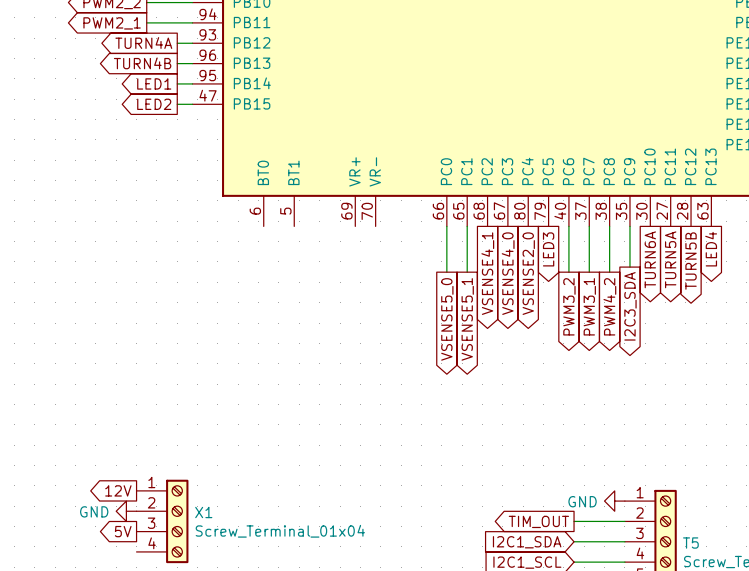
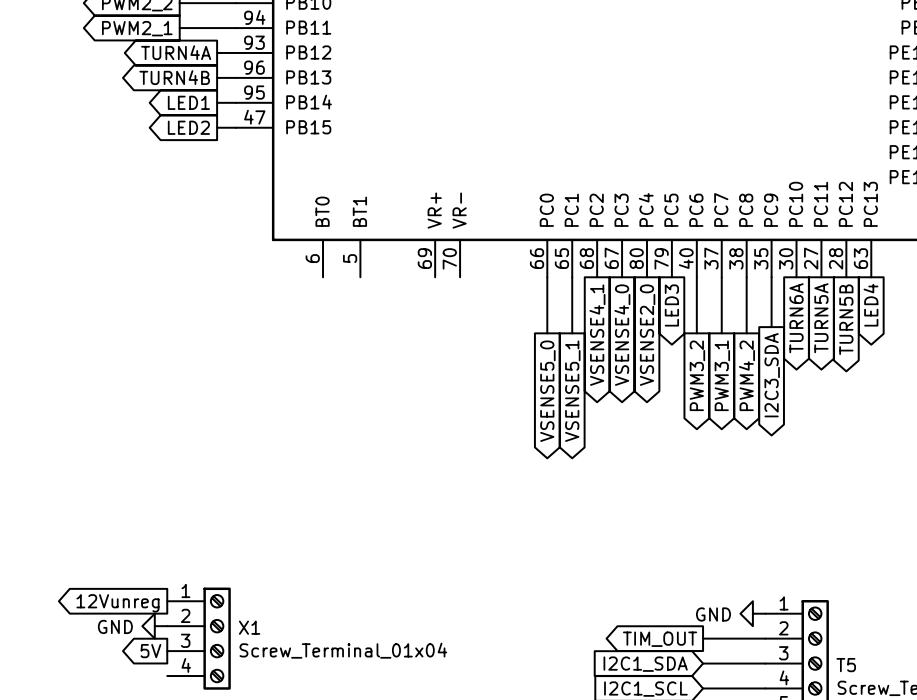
global label: 12V (118, 490) -> 12Vunreg (117, 603)

